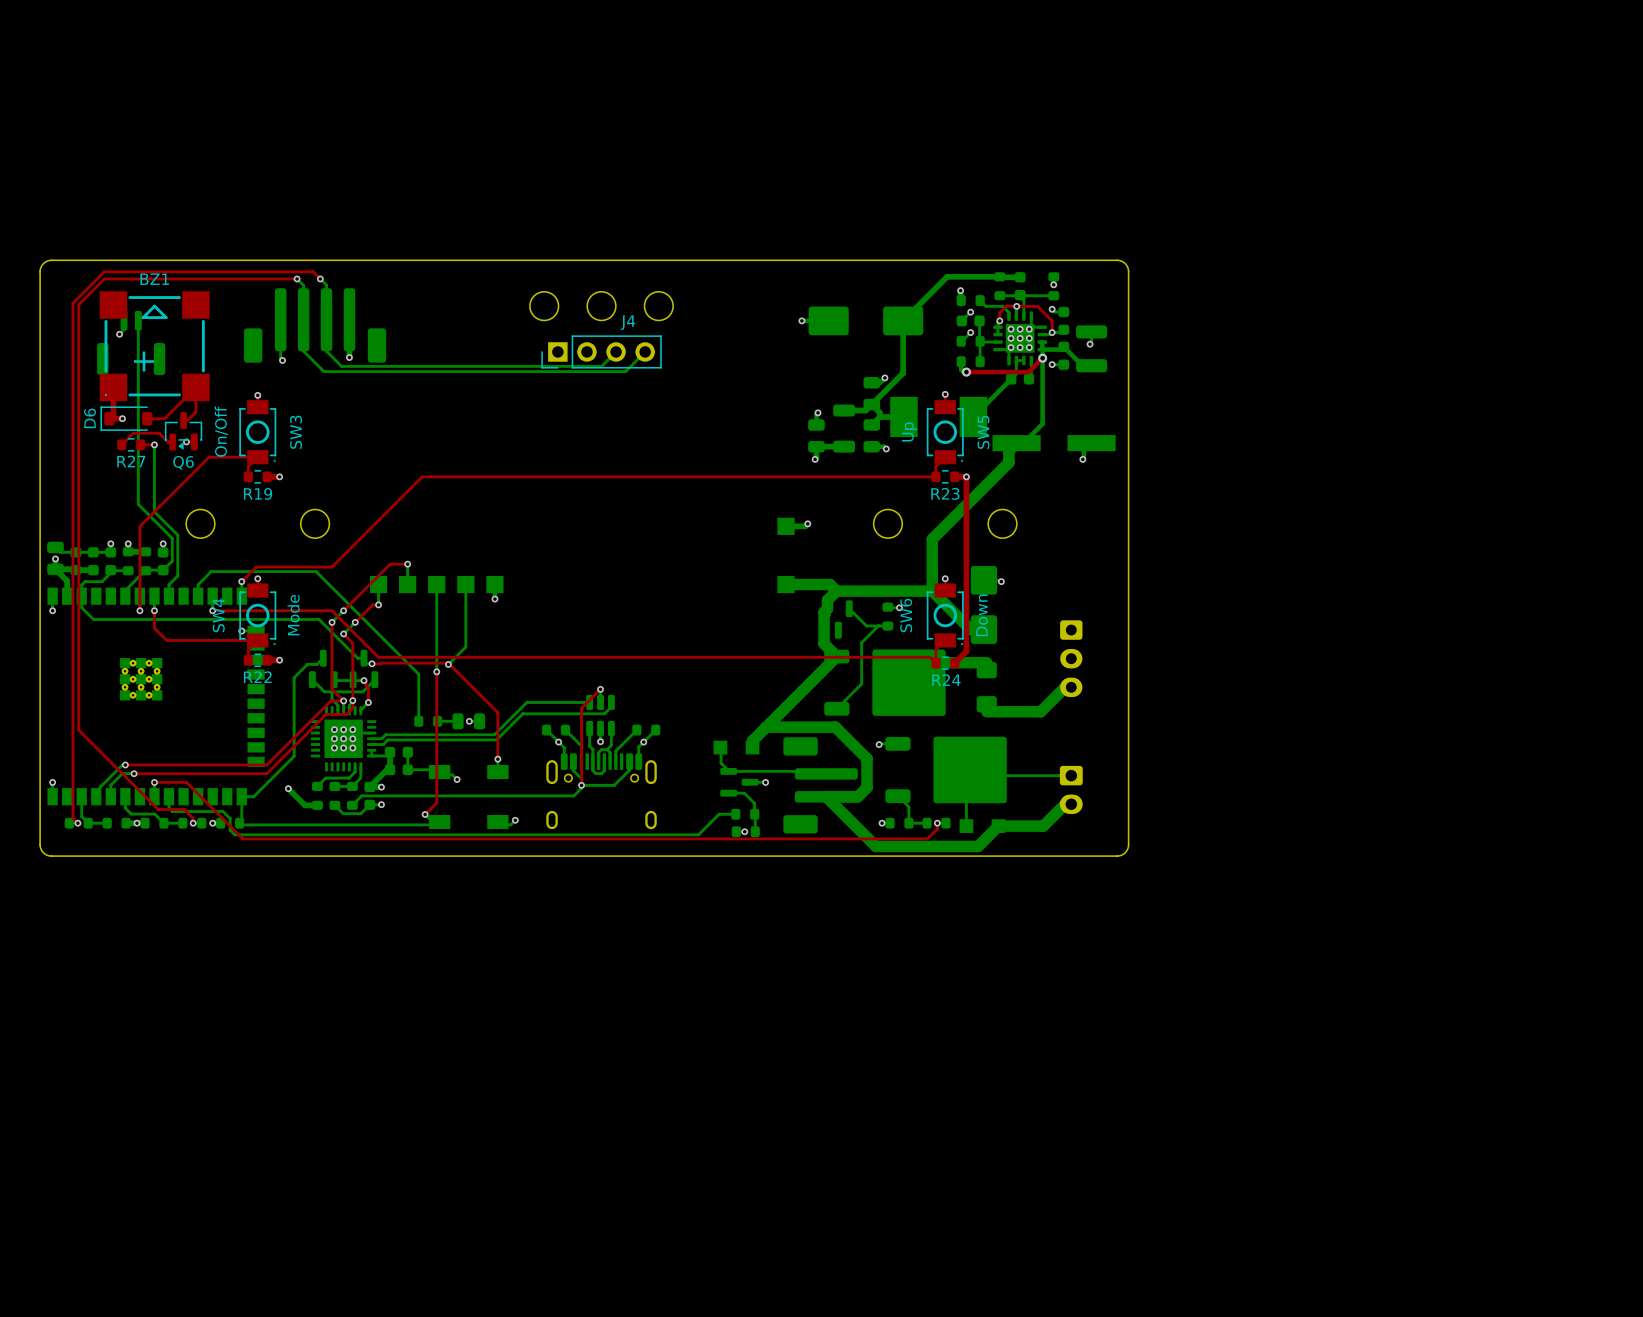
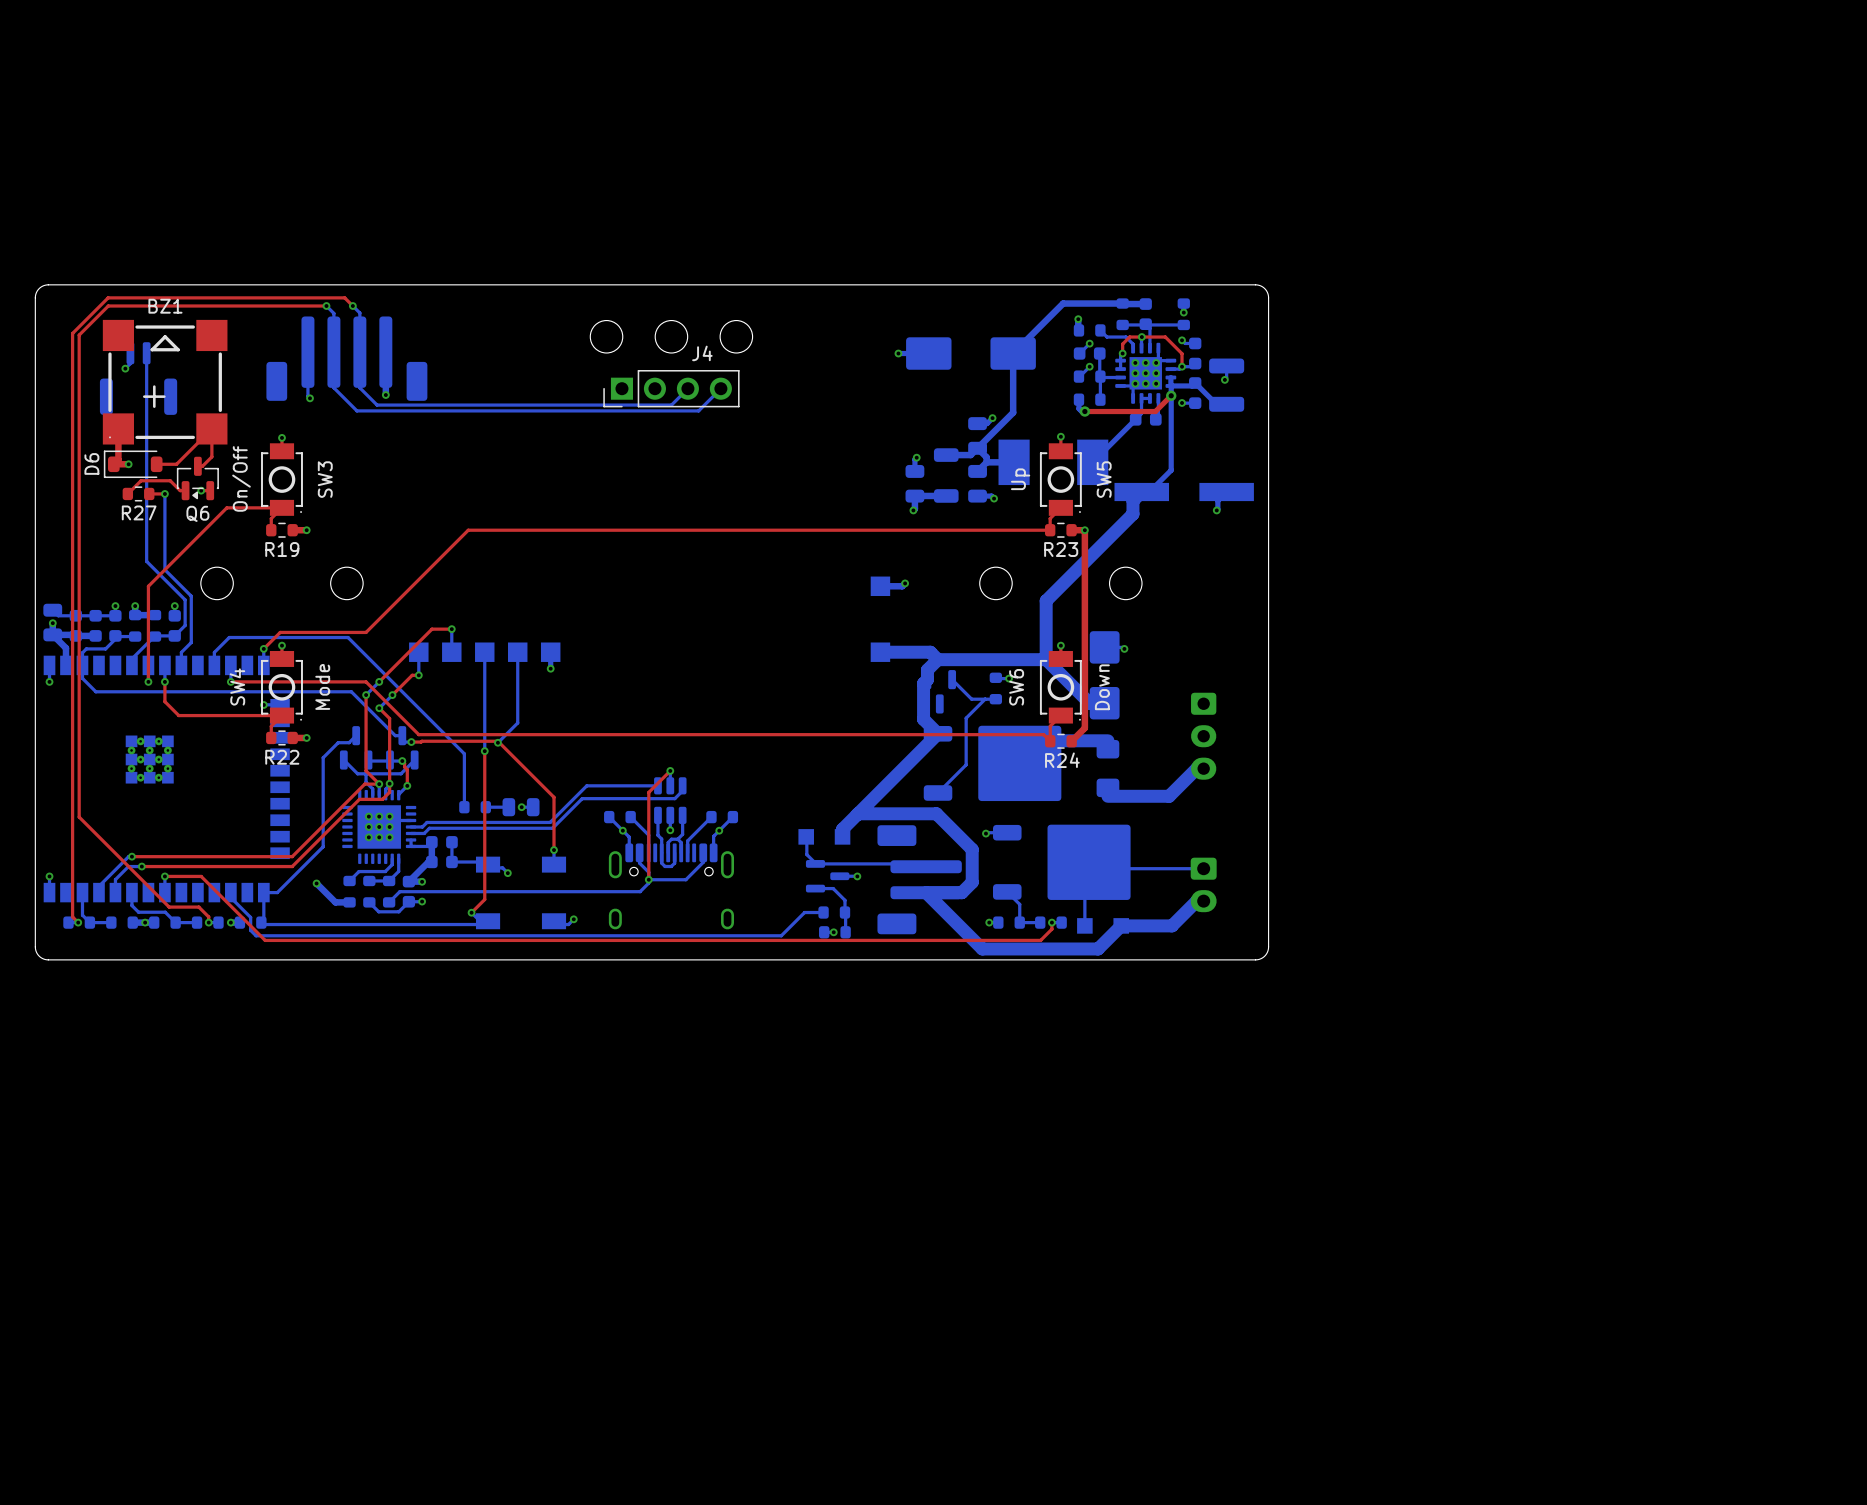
bottom track: (169, 796) (169, 808) (172, 811) (223, 811) -> (230, 892) (230, 897) (242, 909)

